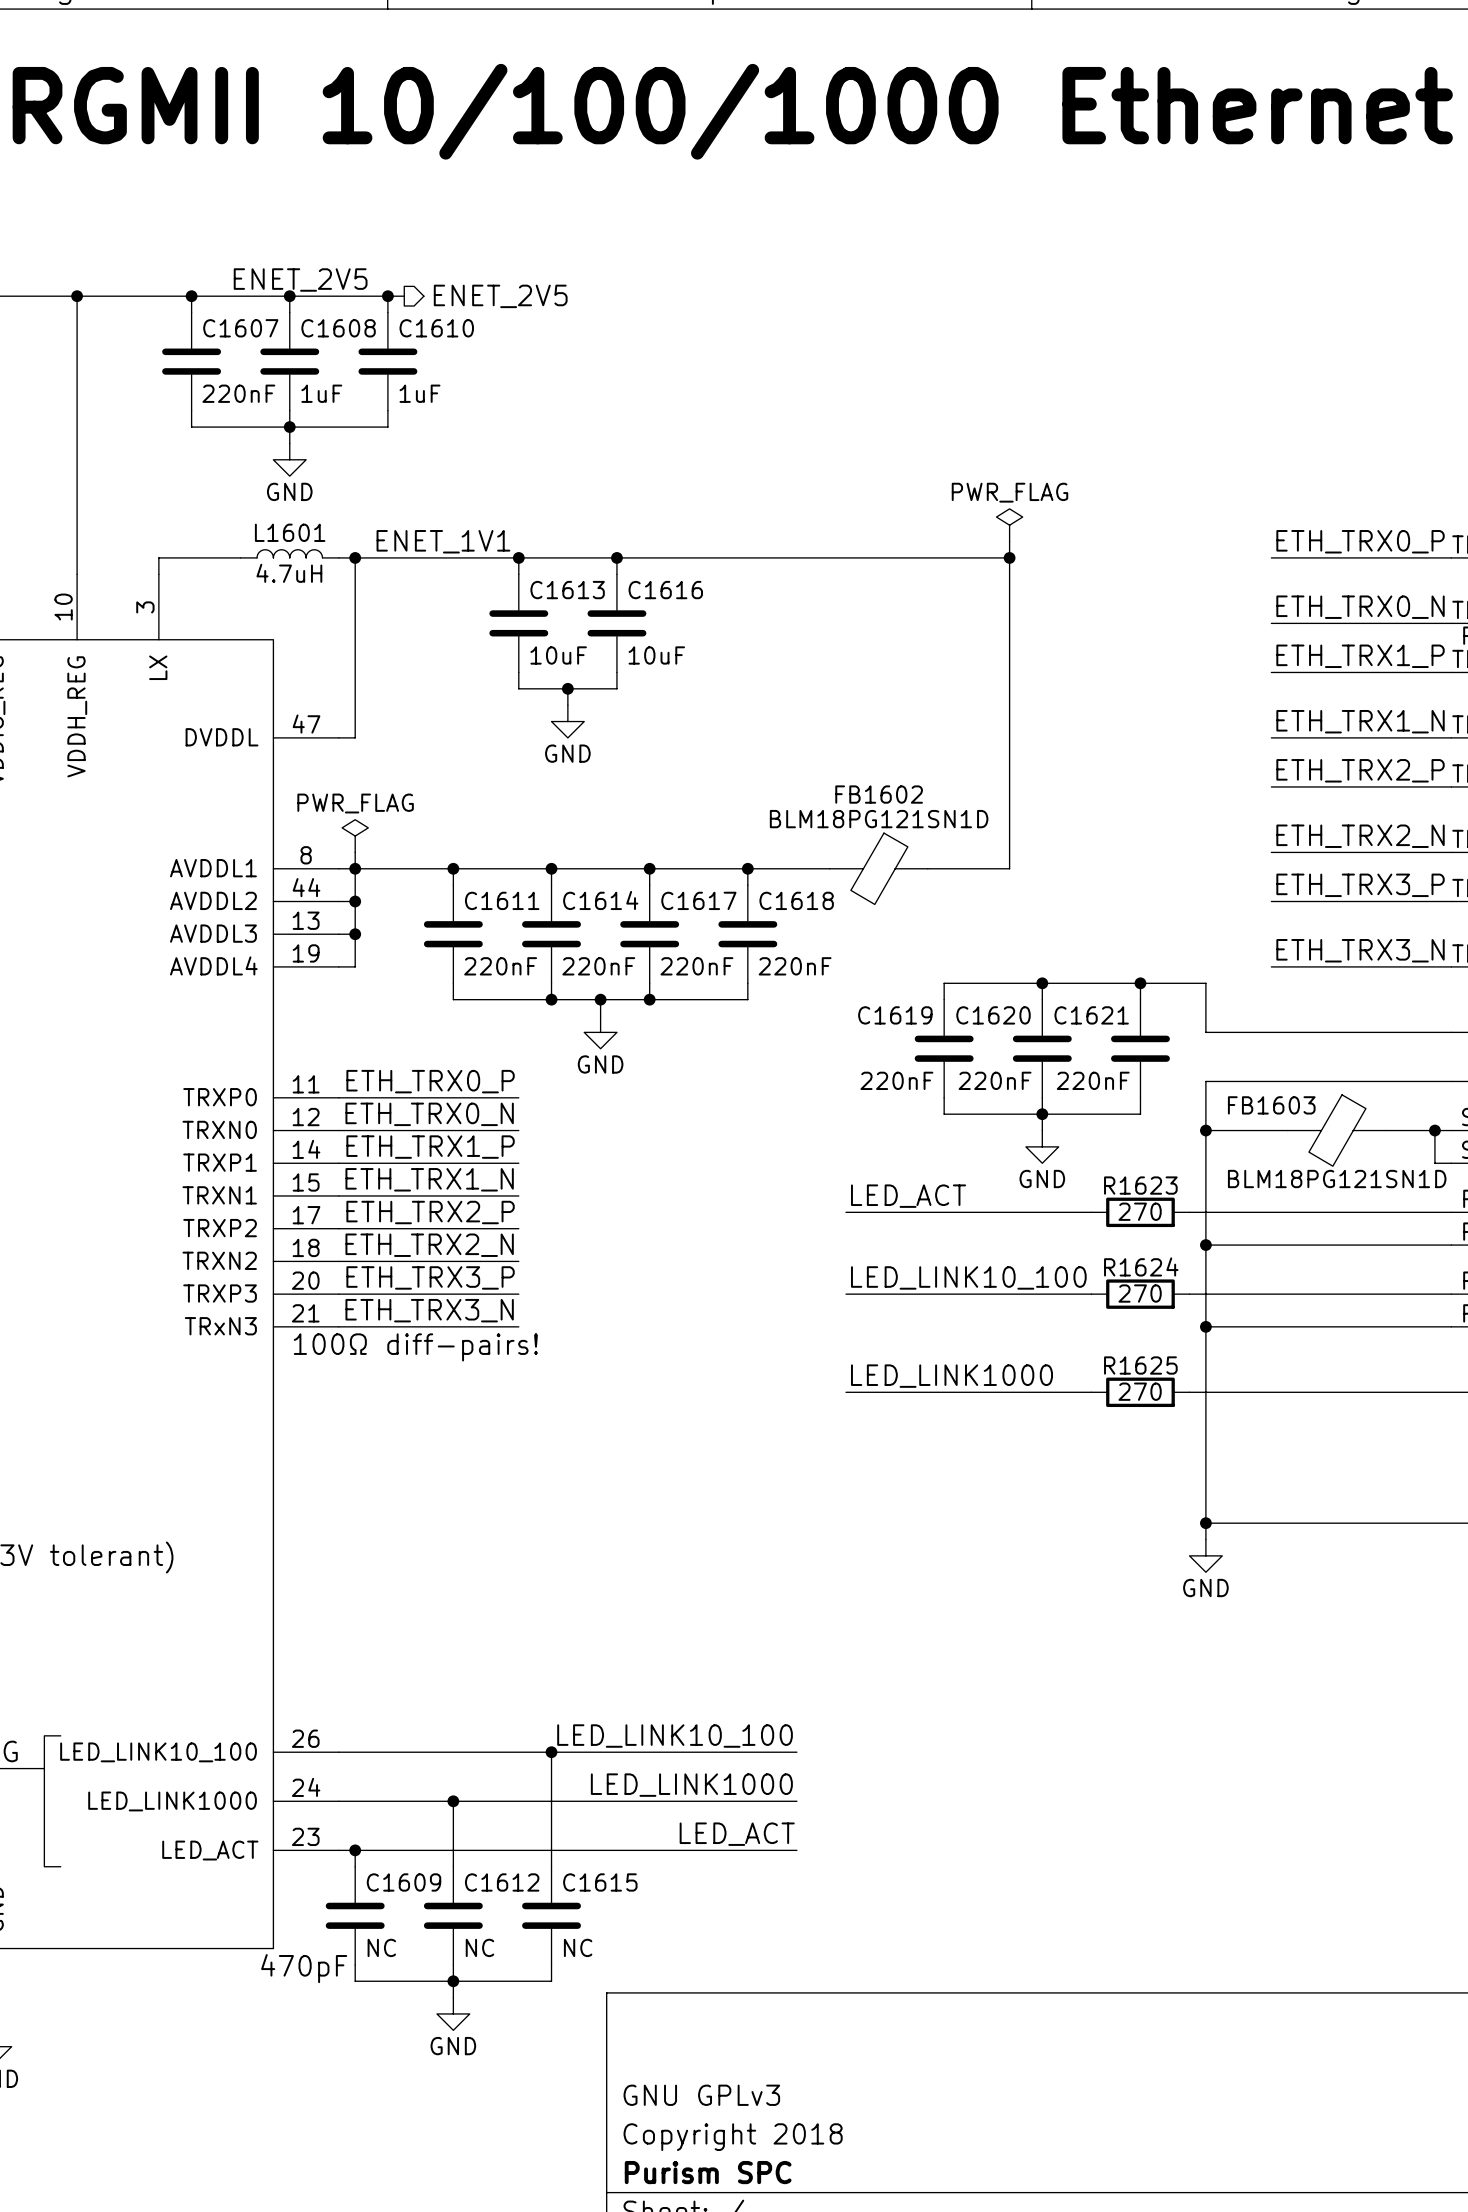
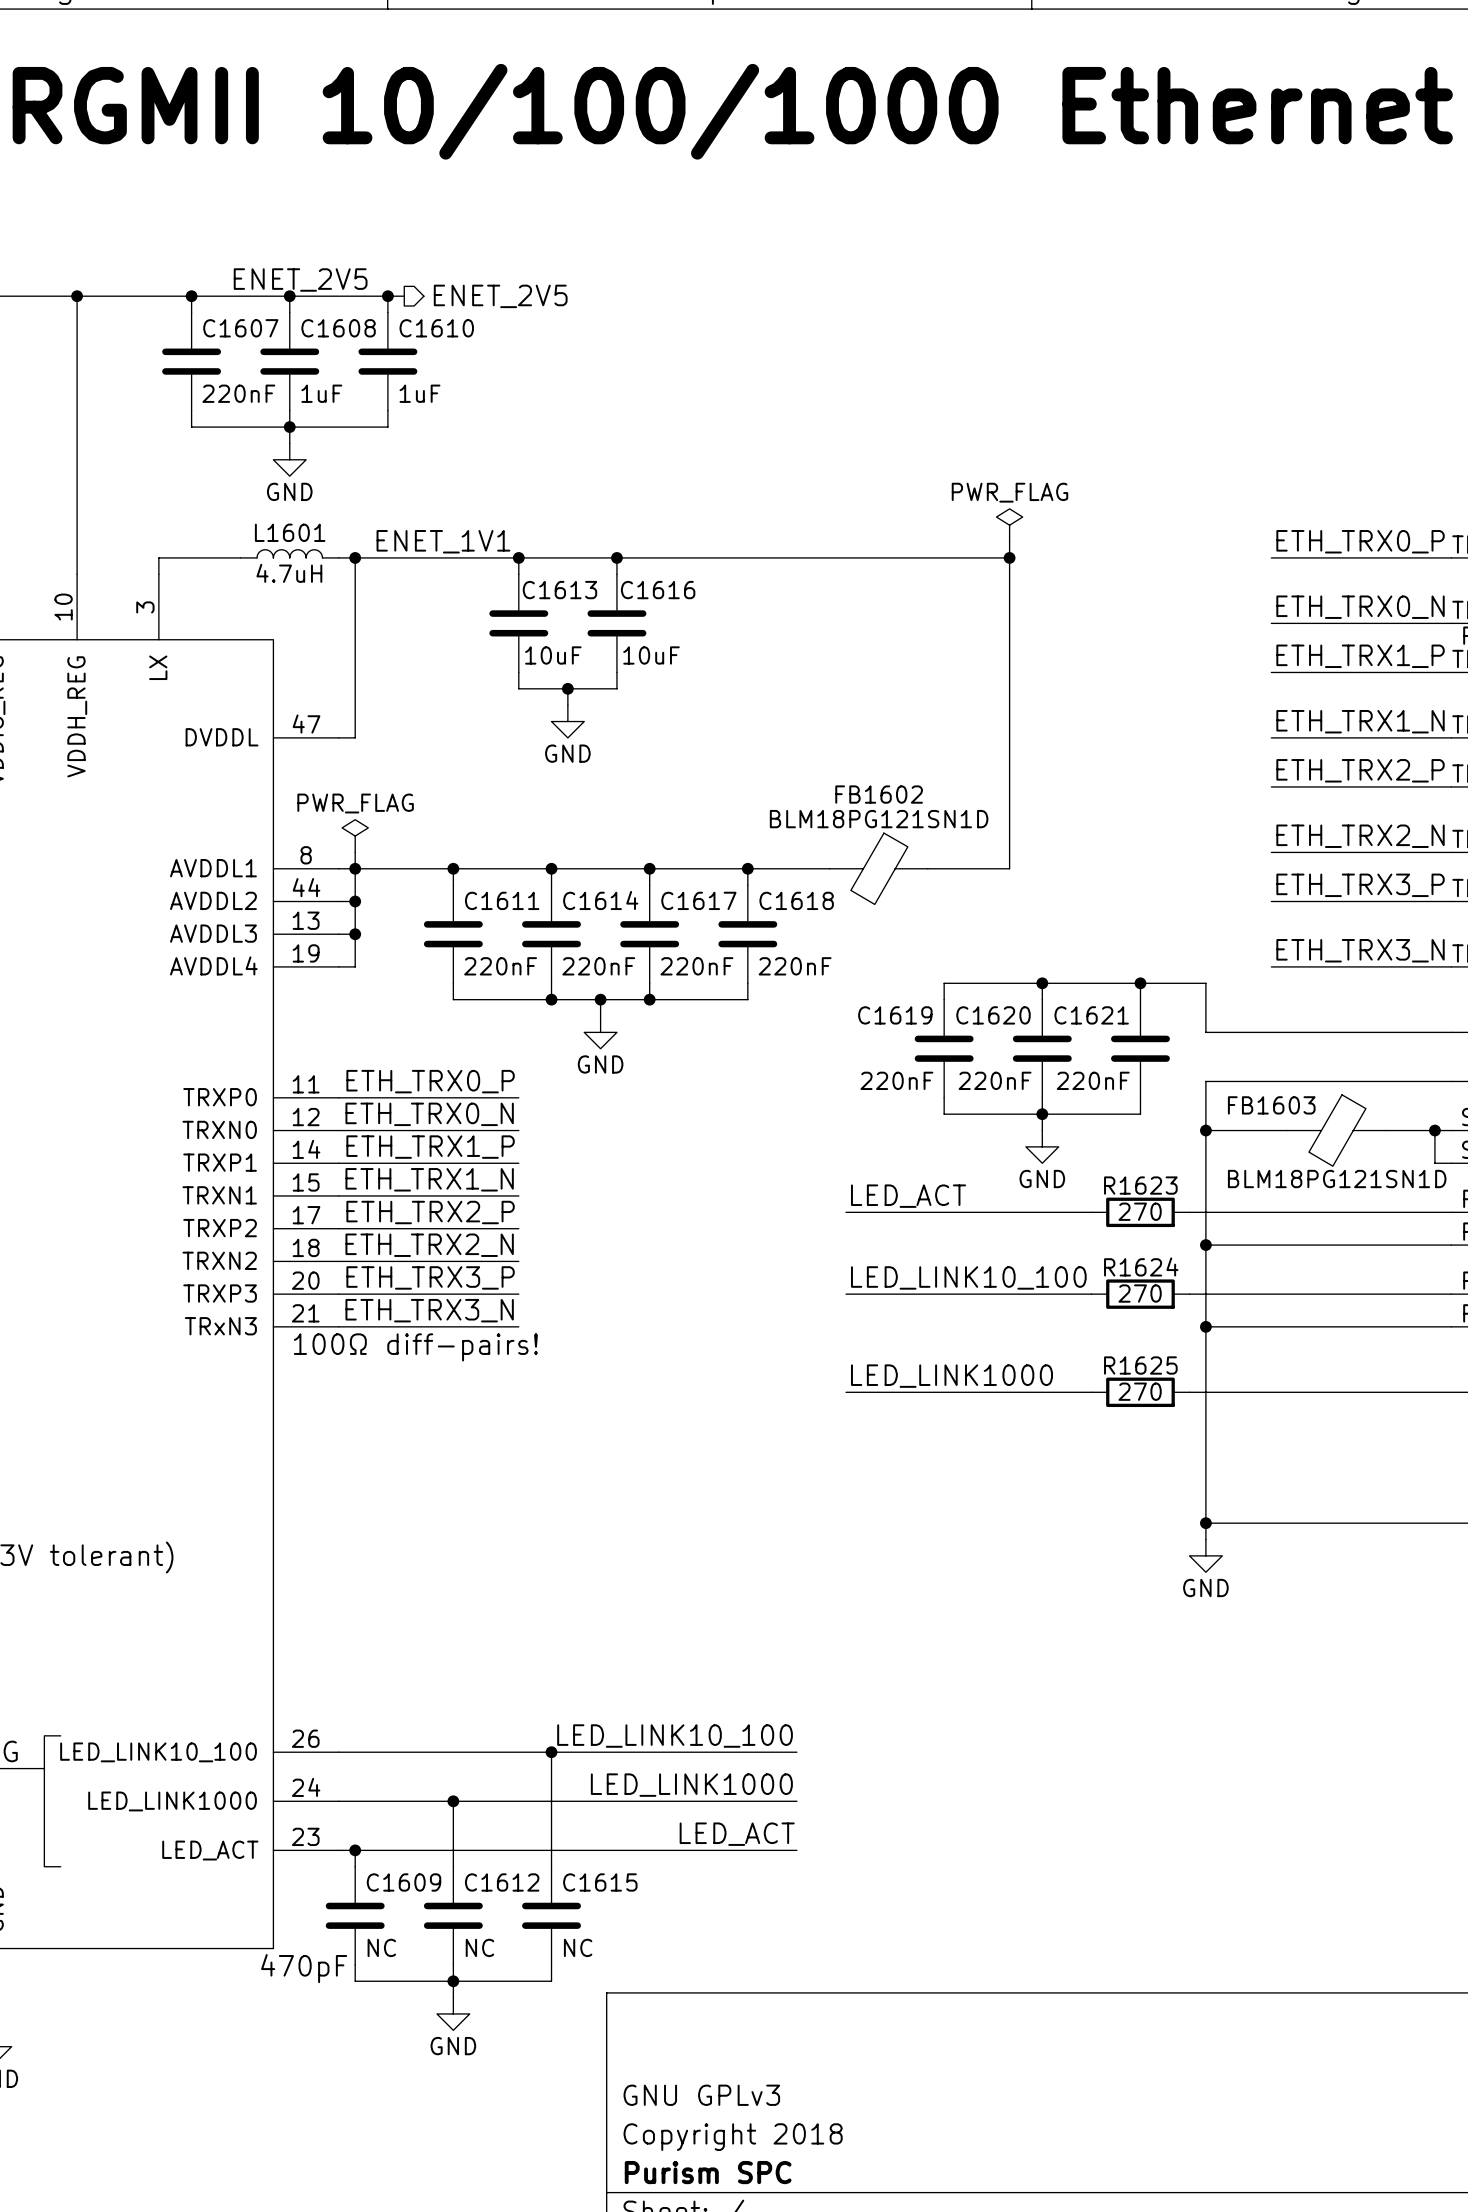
C1613 name position: C1613 (567, 590) -> C1613 (559, 590)
C1616 name position: C1616 (665, 590) -> C1616 (658, 590)
C1613 value position: 10uF (558, 655) -> 10uF (553, 655)
C1616 value position: 10uF (656, 655) -> 10uF (651, 655)

